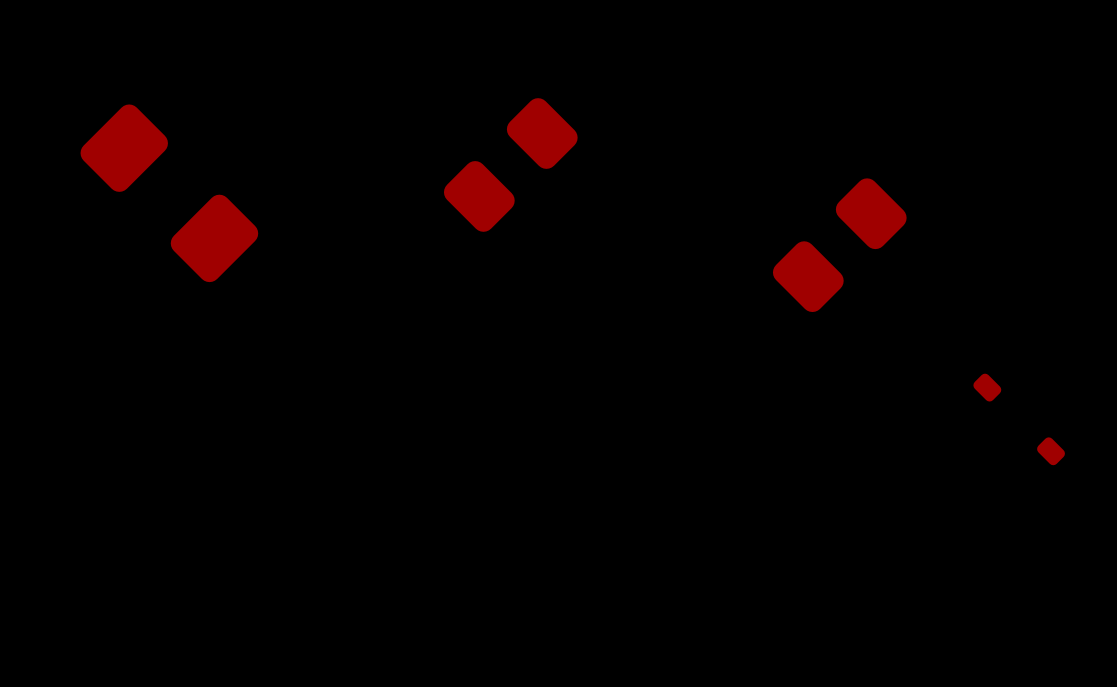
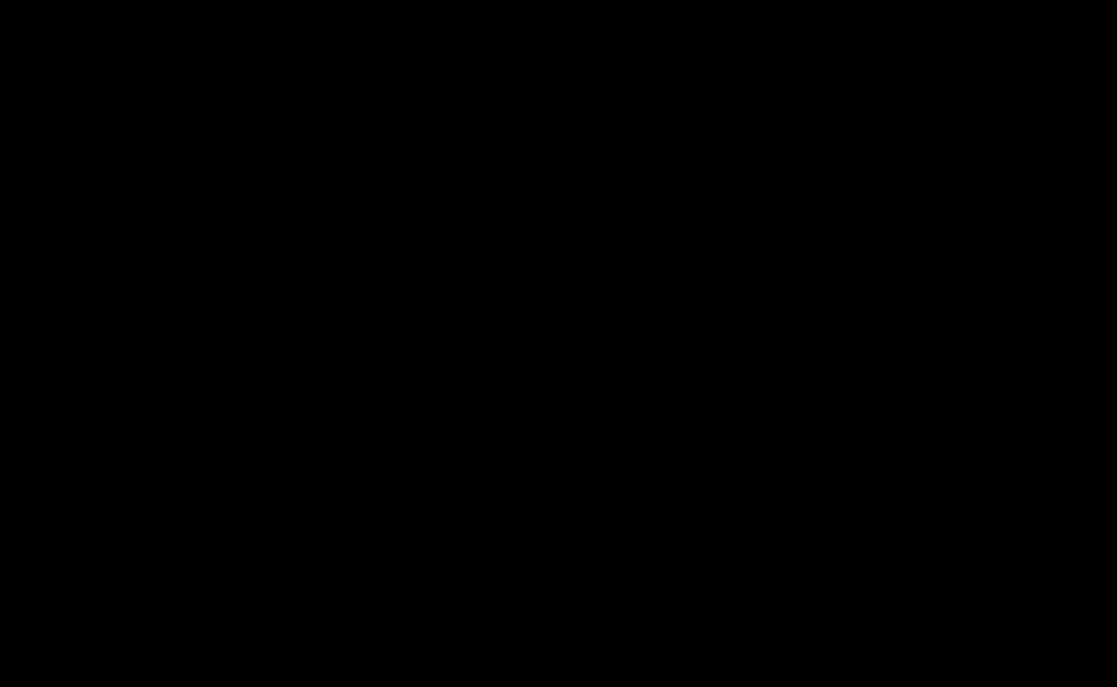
part: (510, 164) -> none
part: (169, 193) -> none
part: (839, 245) -> none
part: (1019, 419) -> none

